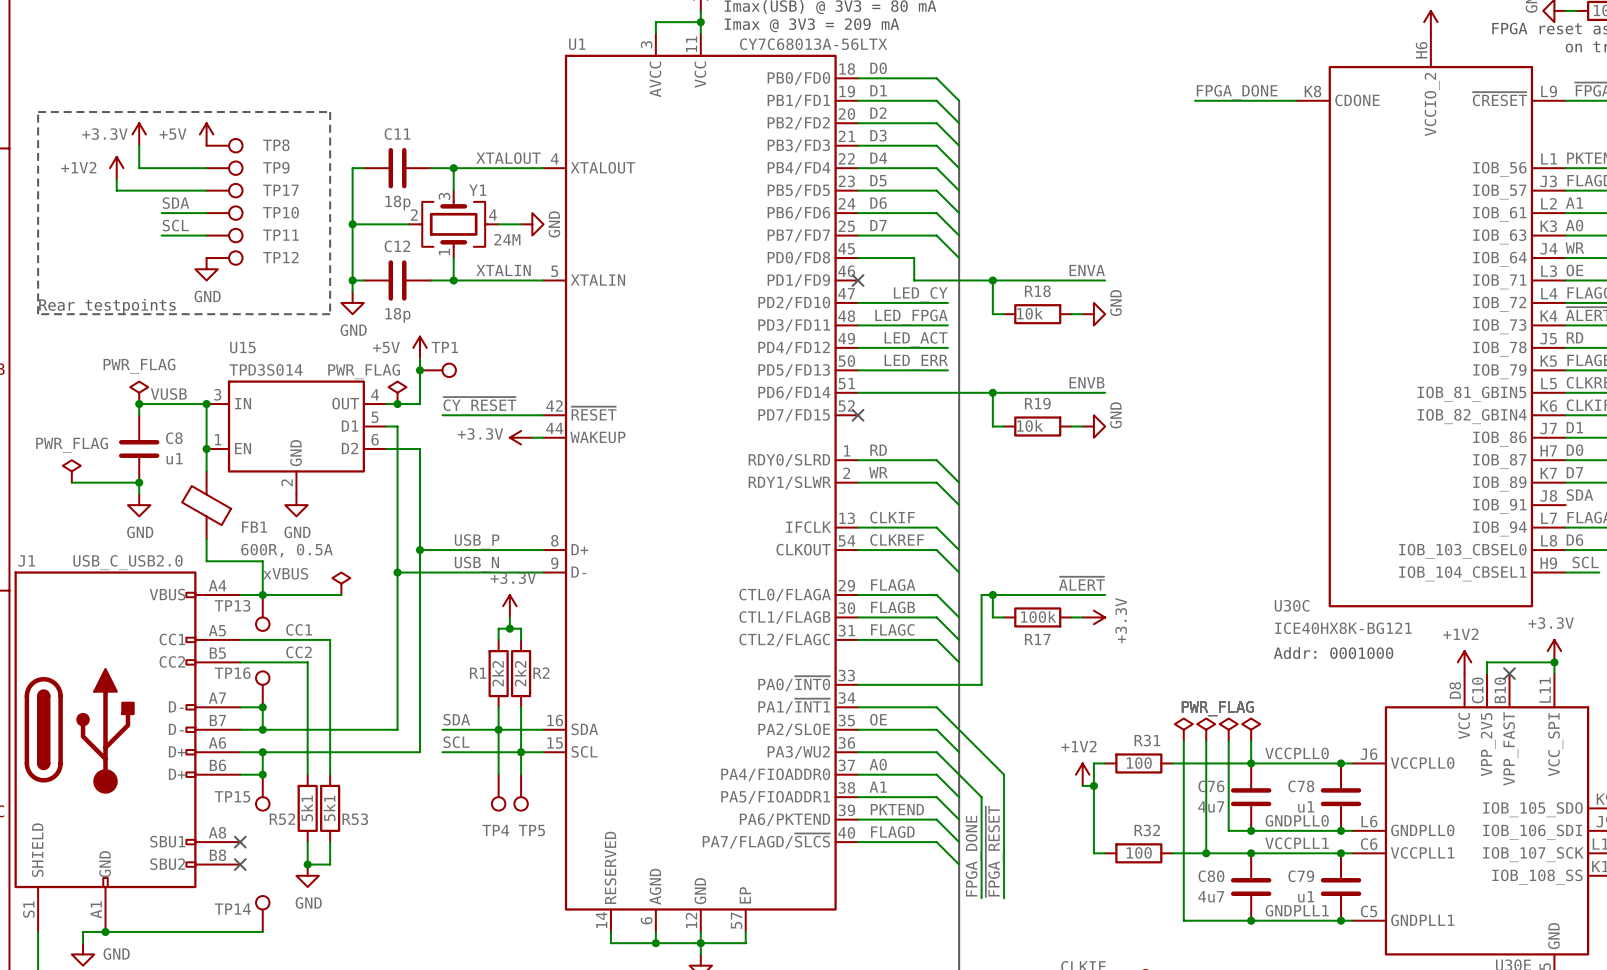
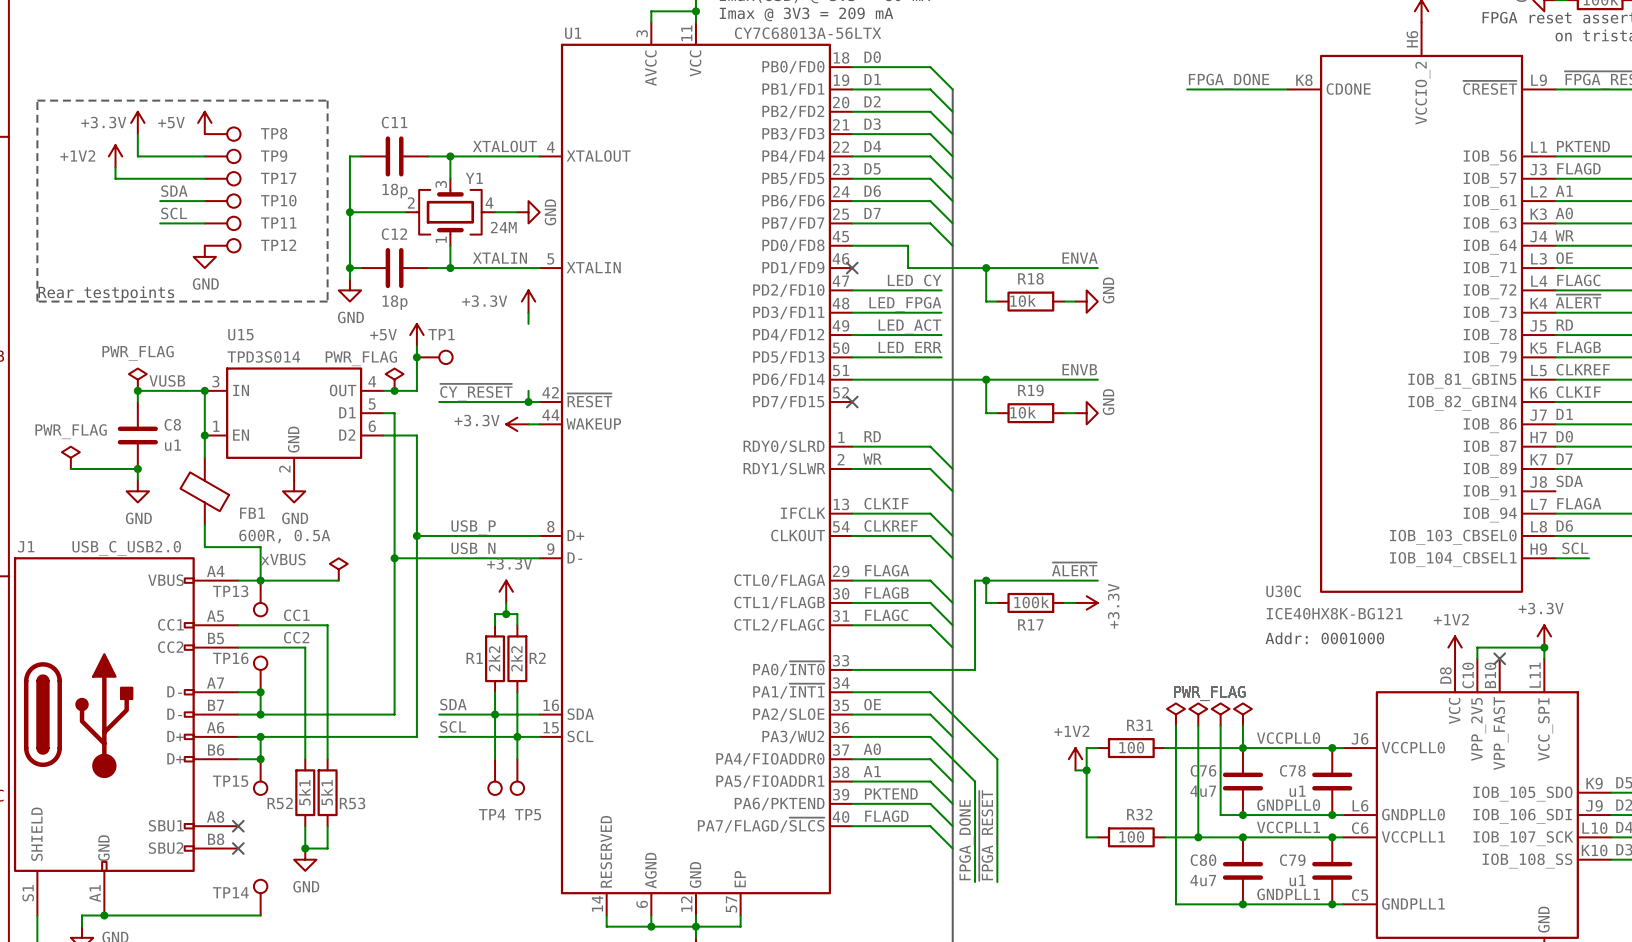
power symbol: none -> +3.3V (528, 301)
wire: none -> (528, 312) (528, 323)
wire: none -> (528, 390) (528, 402)
junction: none -> (528, 402)

